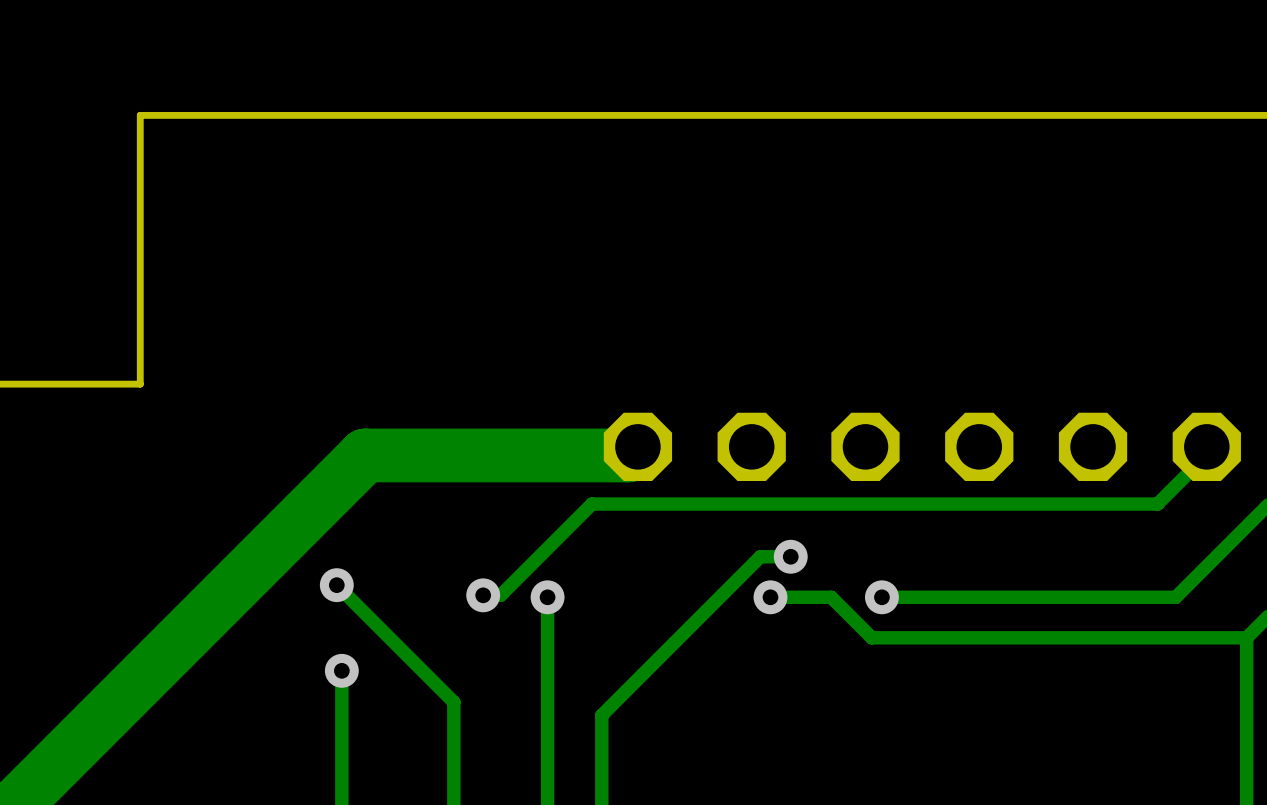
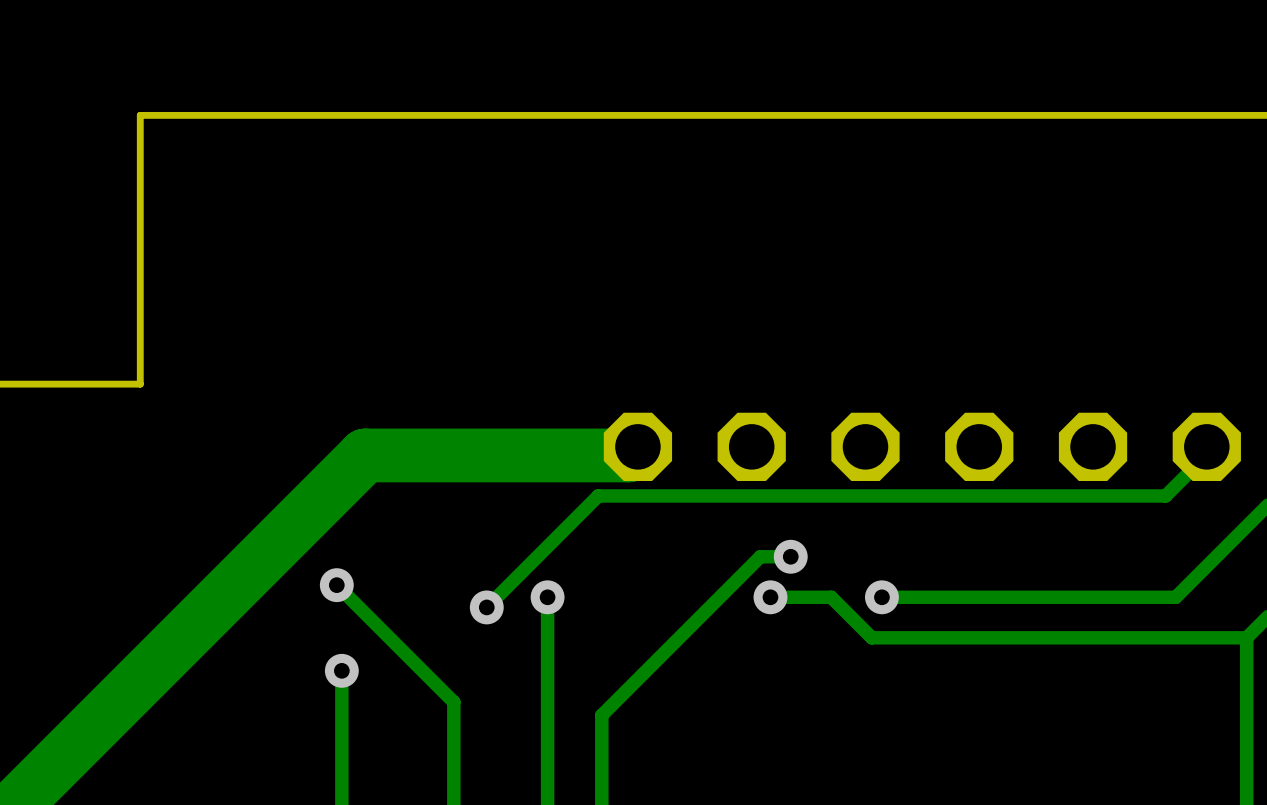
track: (1165, 495) (1157, 504) (591, 504) (500, 595) (483, 595) -> (1165, 495) (598, 495) (486, 607)
via position: (483, 595) -> (486, 607)

